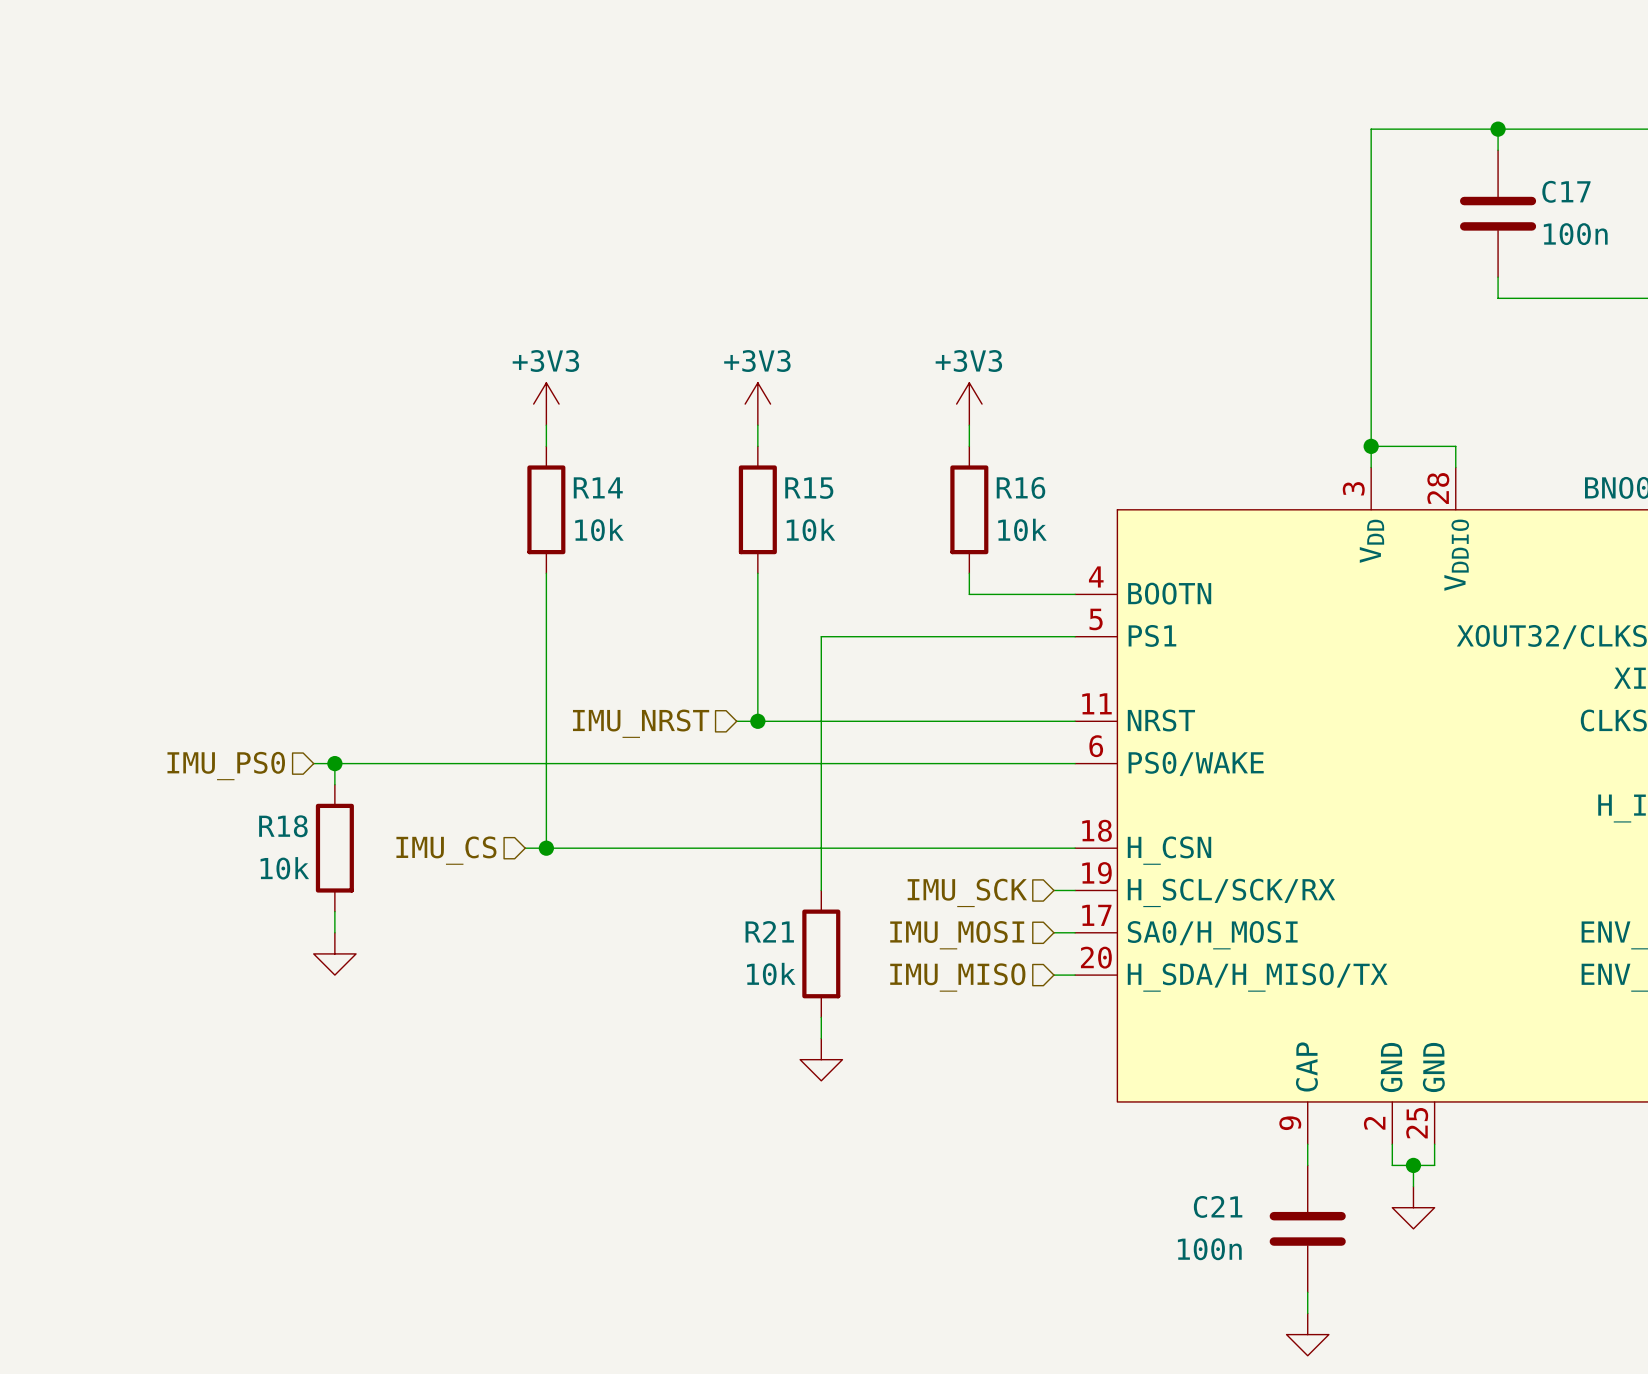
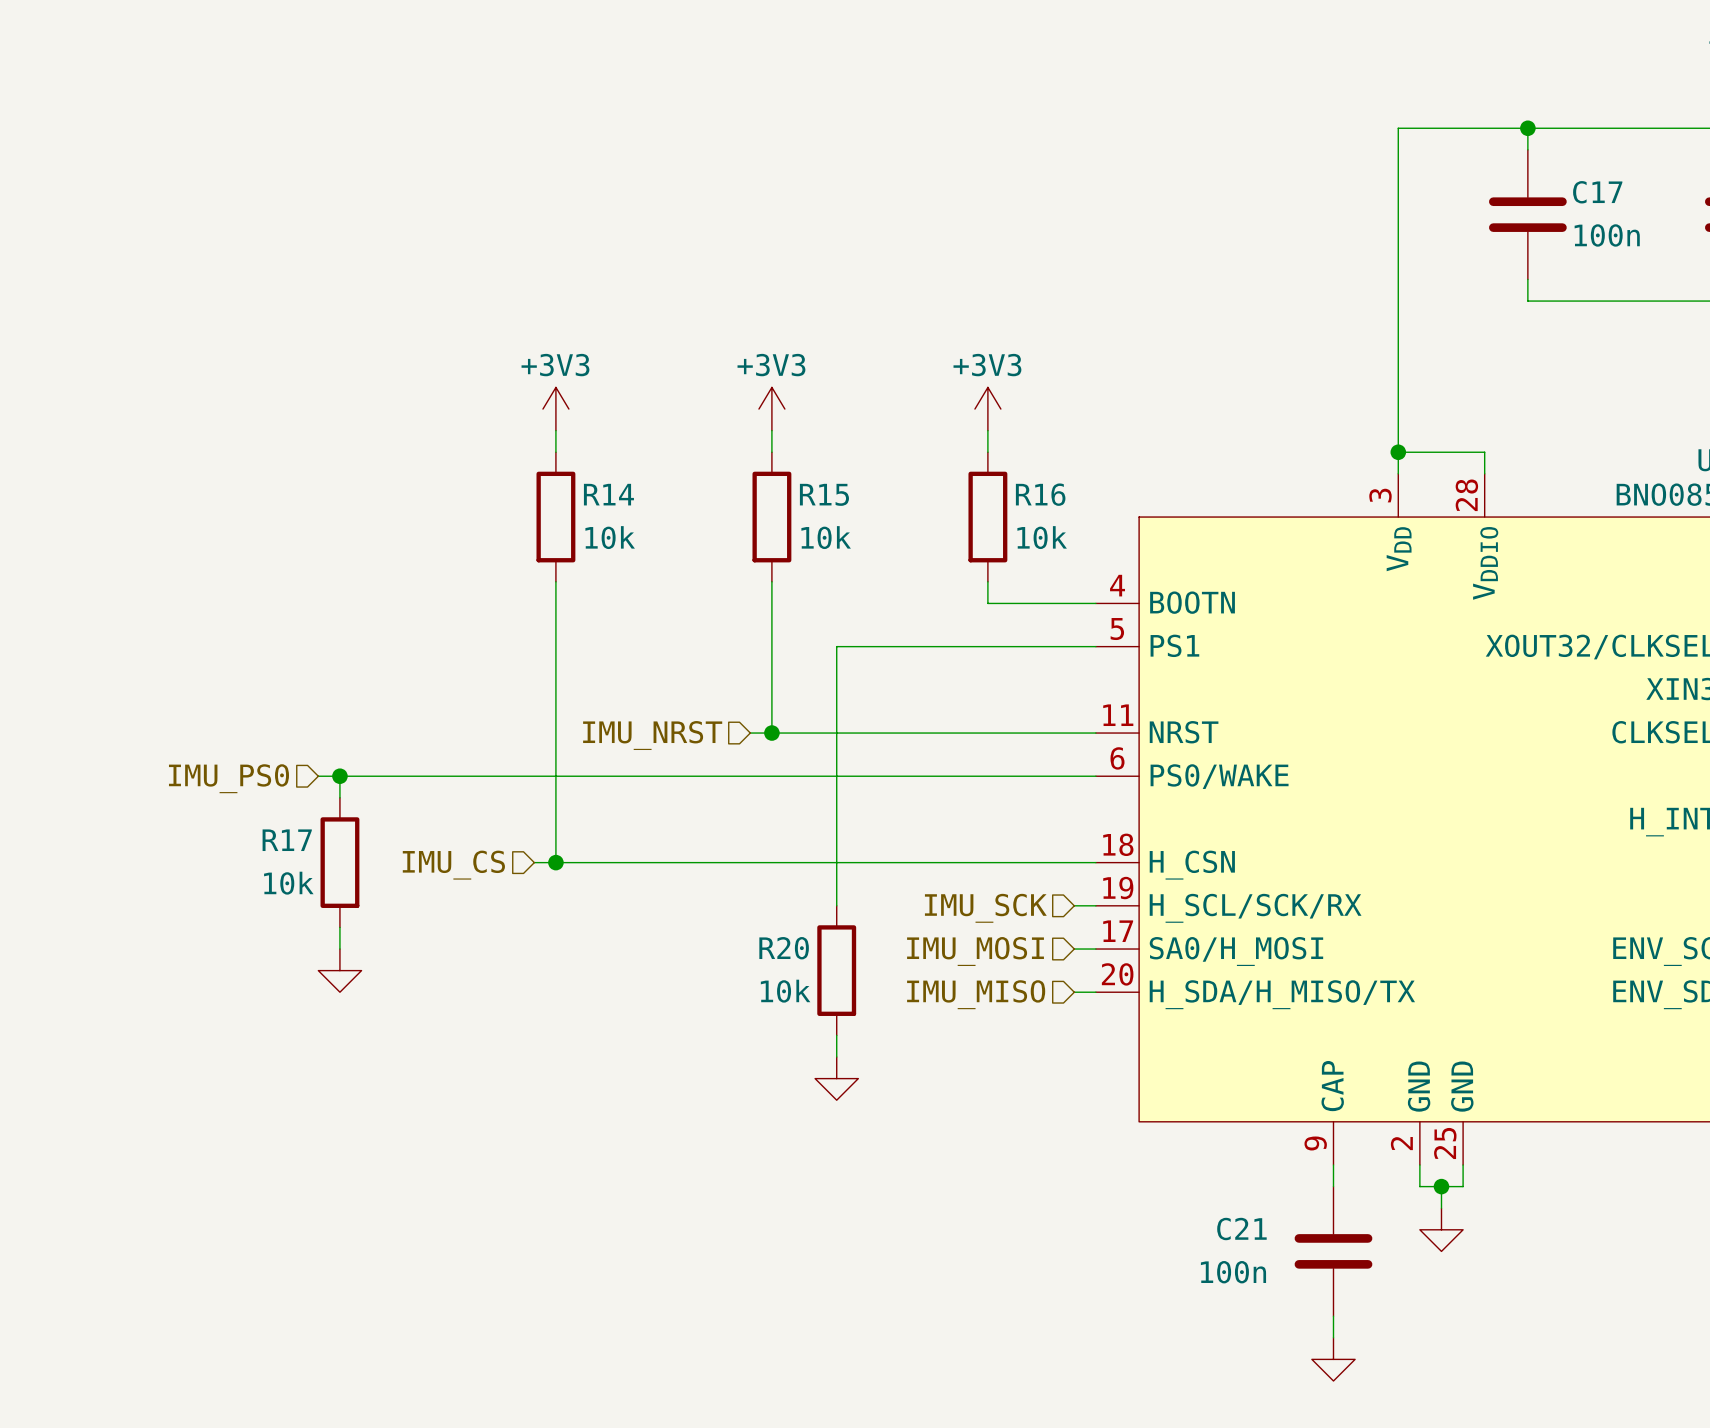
R18 name: R18 (283, 826) -> R17 (287, 840)
R21 name: R21 (769, 931) -> R20 (784, 948)

